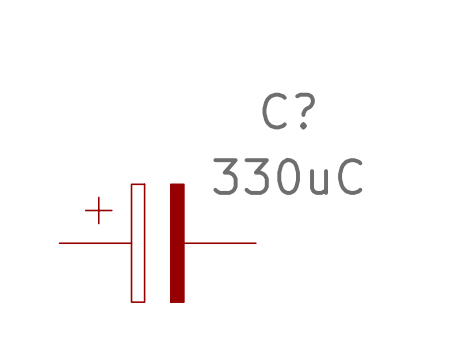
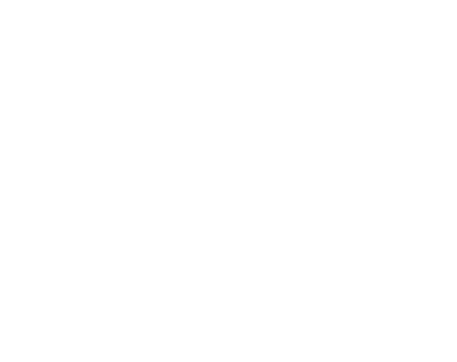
C?: 330uC (157, 243) -> none

